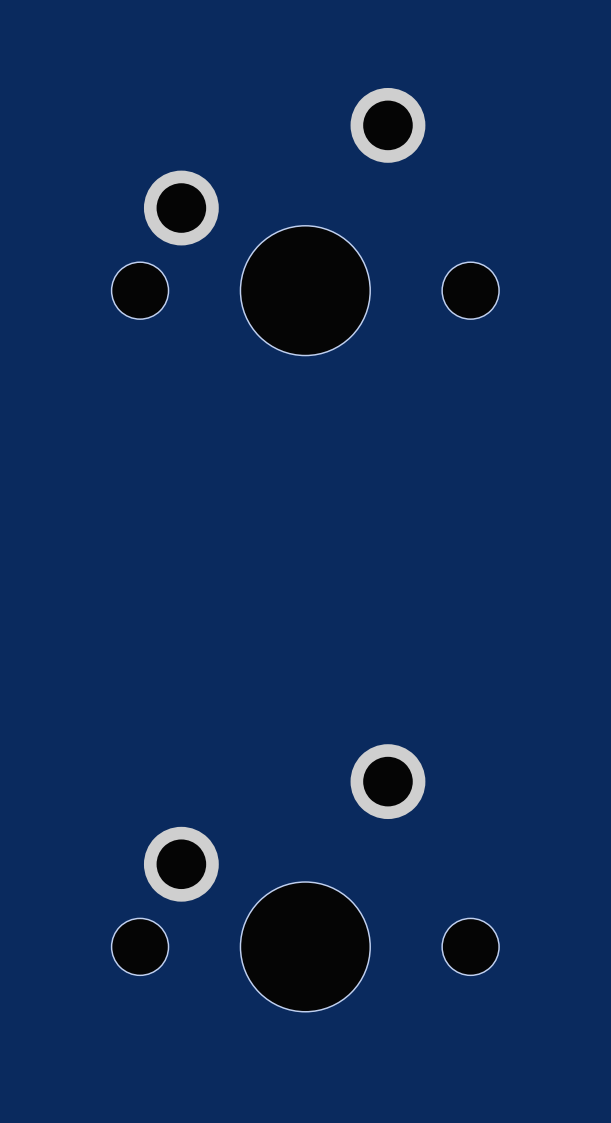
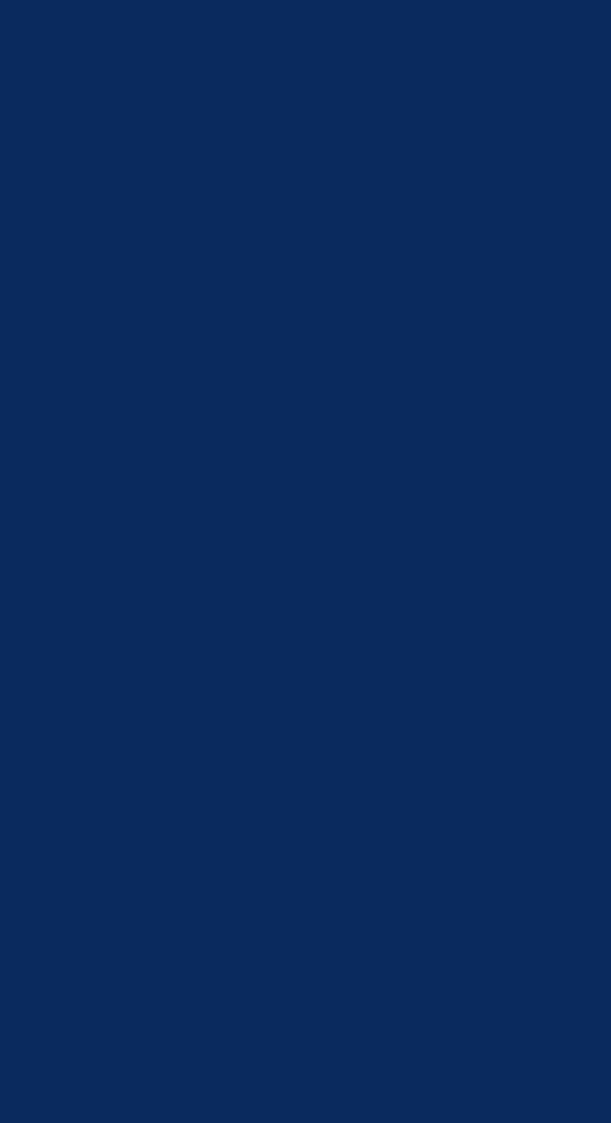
part: (305, 221) -> none
part: (305, 877) -> none

